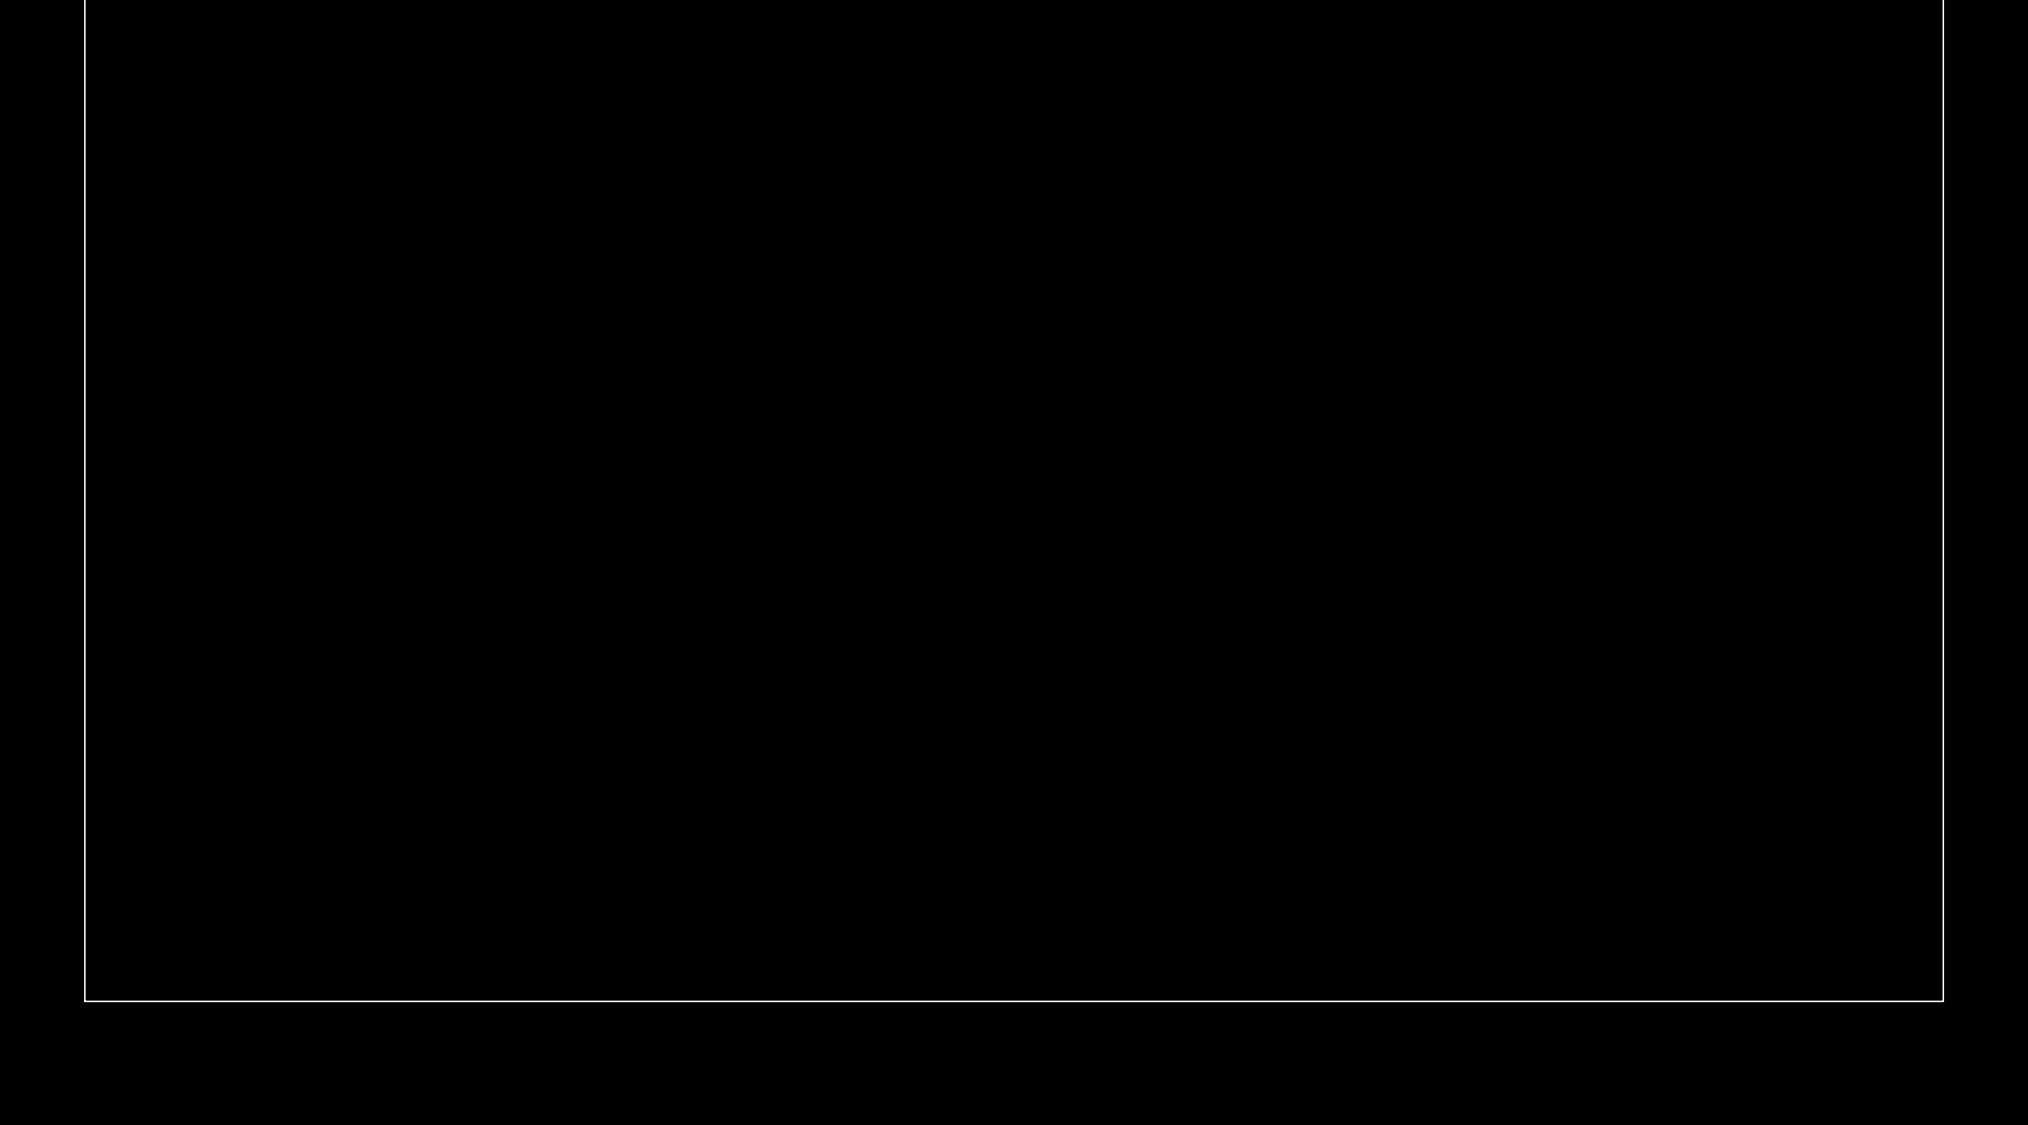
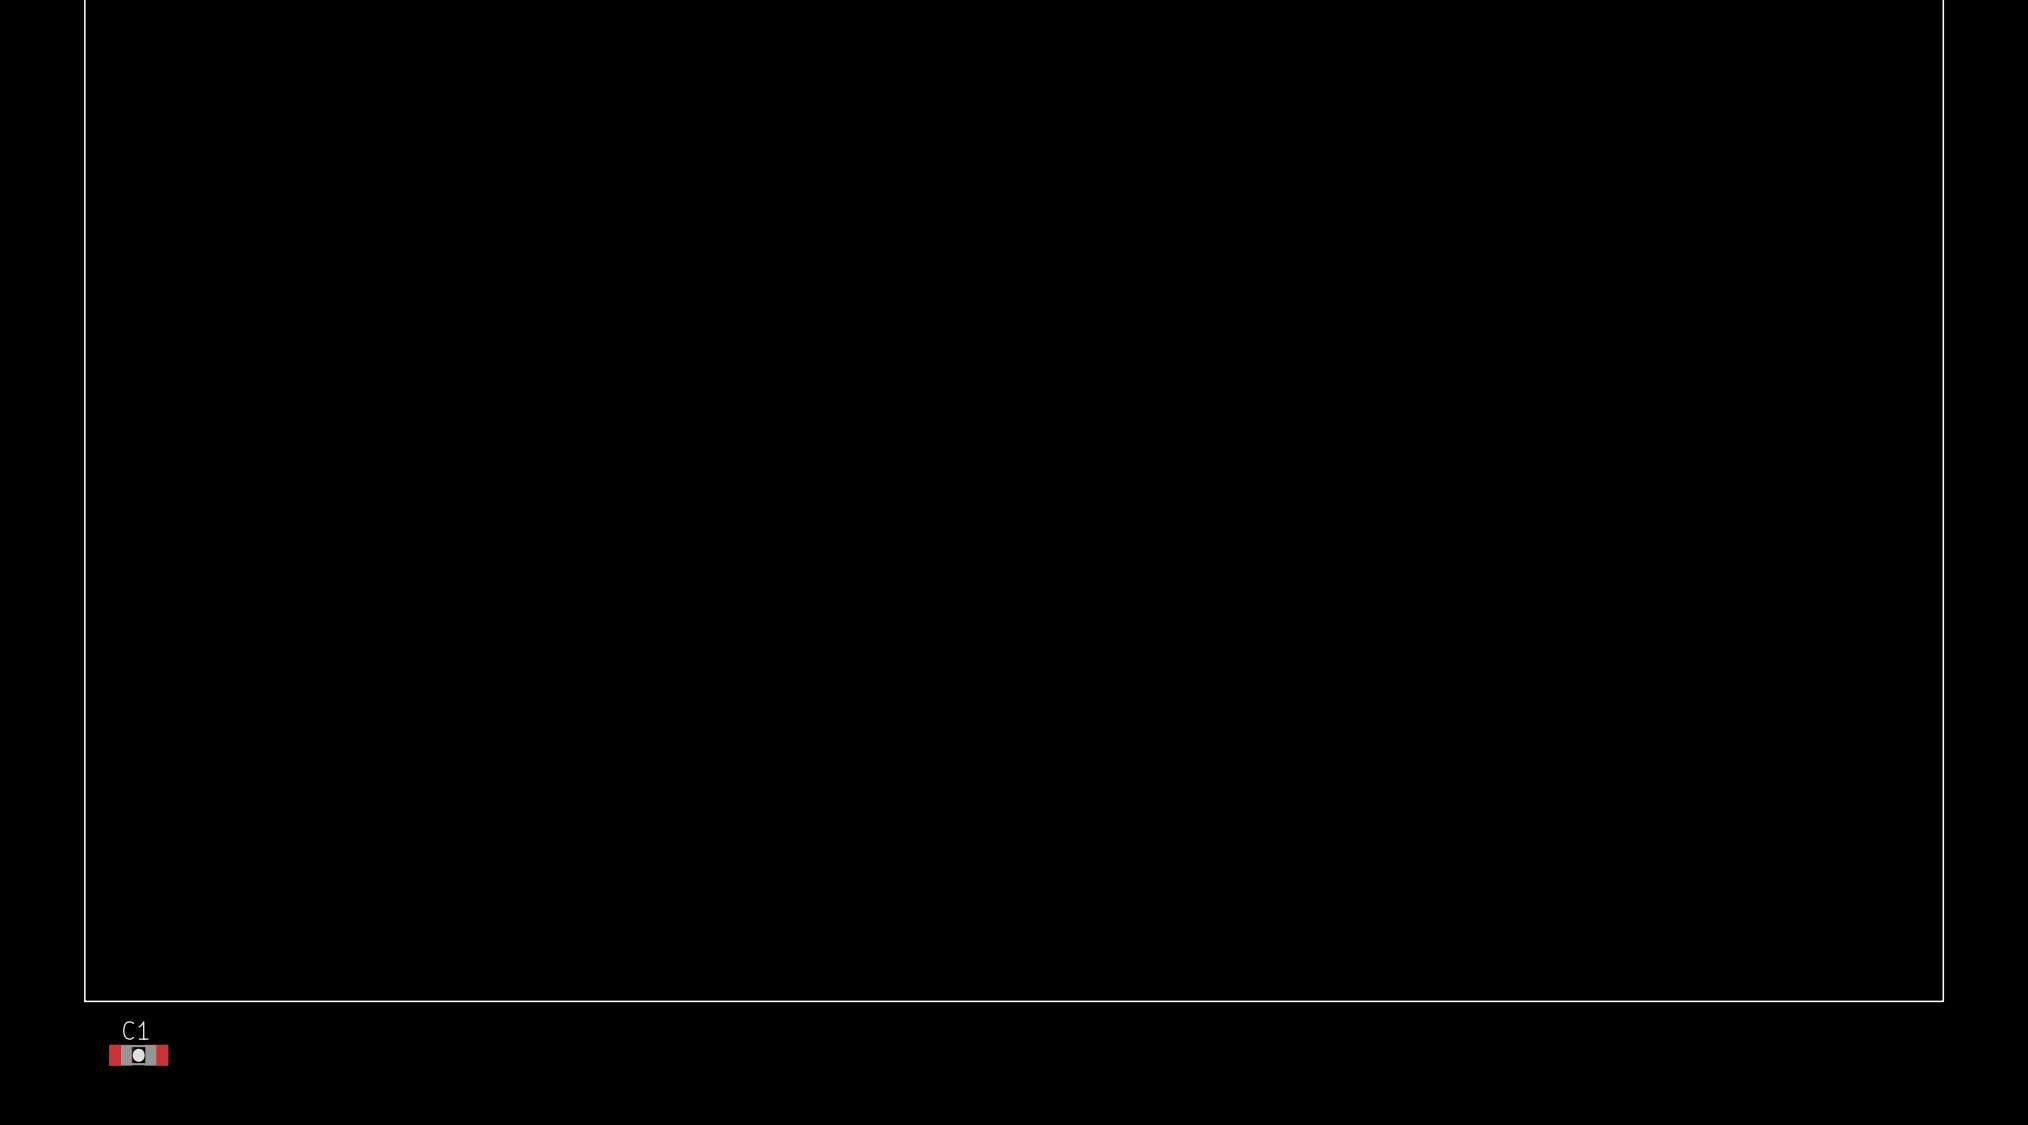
C1: none -> (138, 1055)

